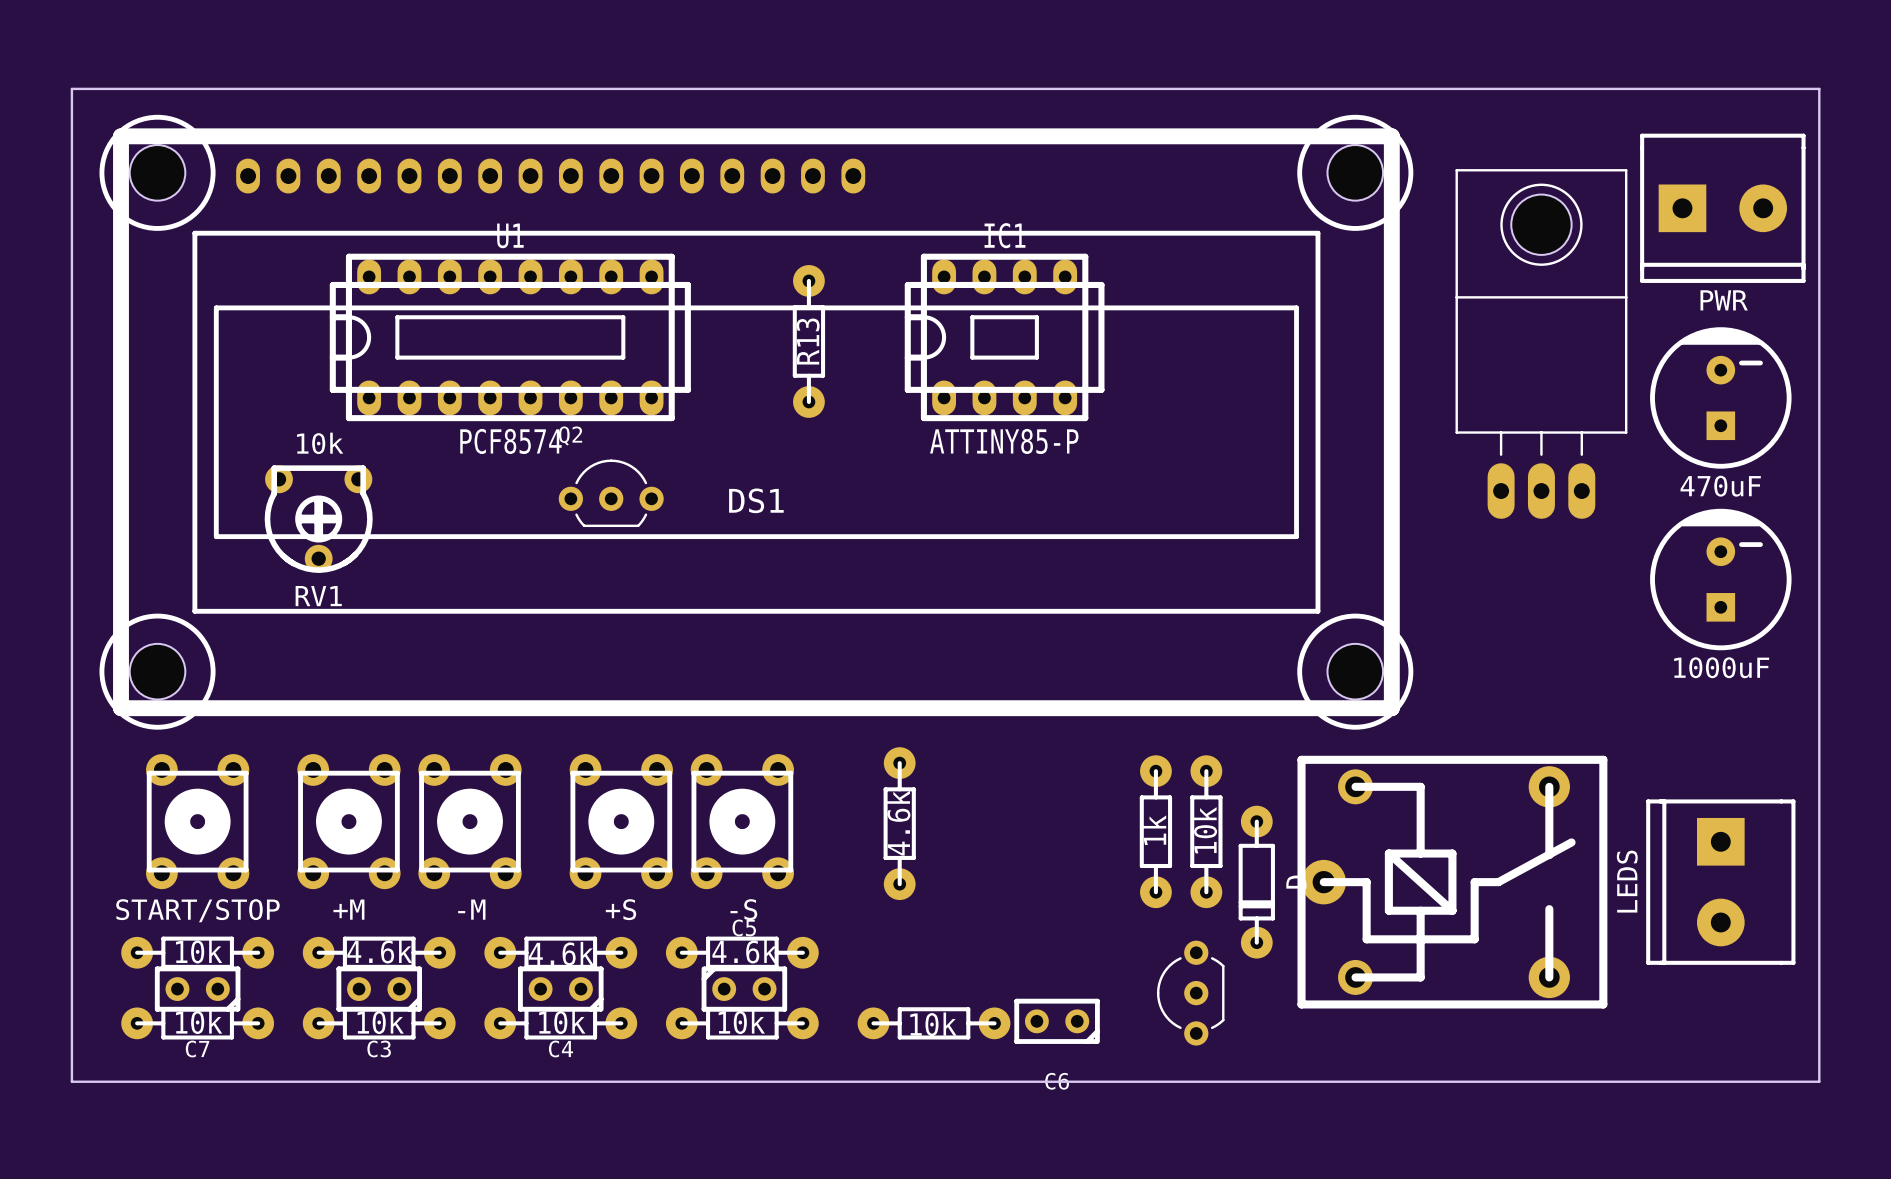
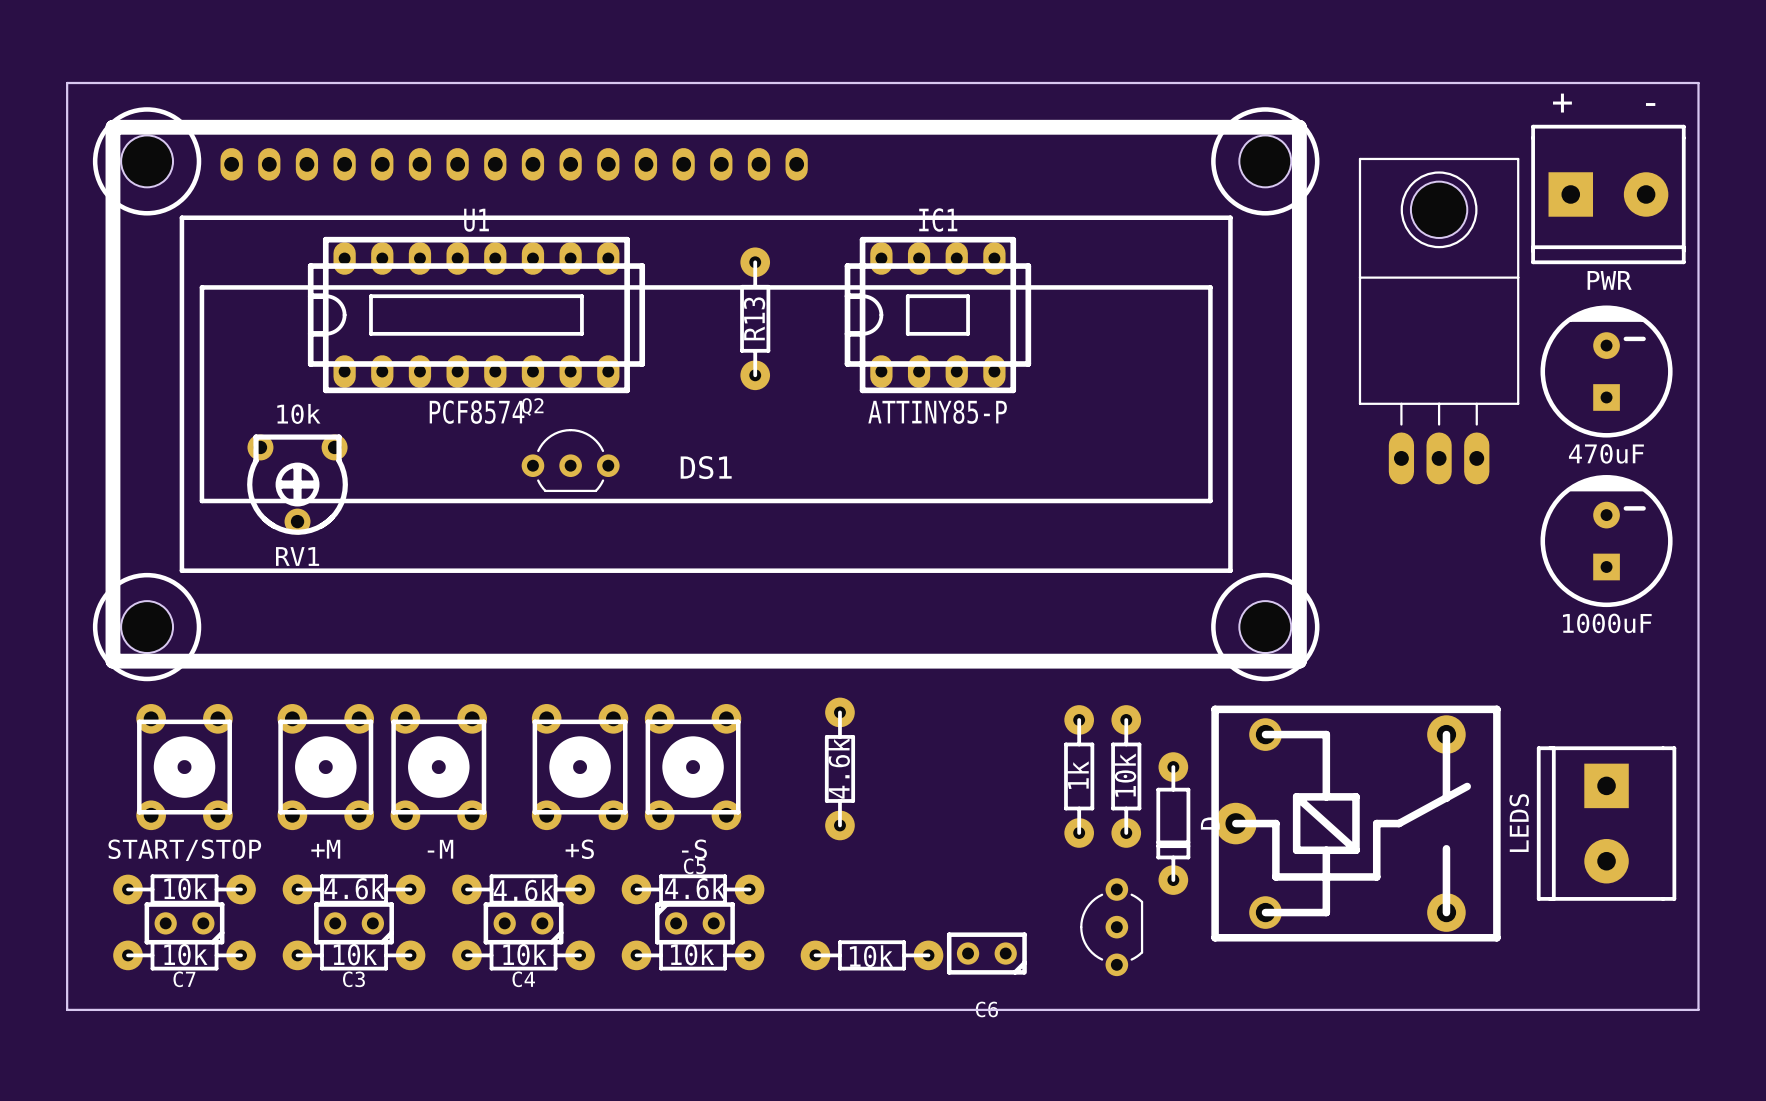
text: none -> + - (1604, 103)

